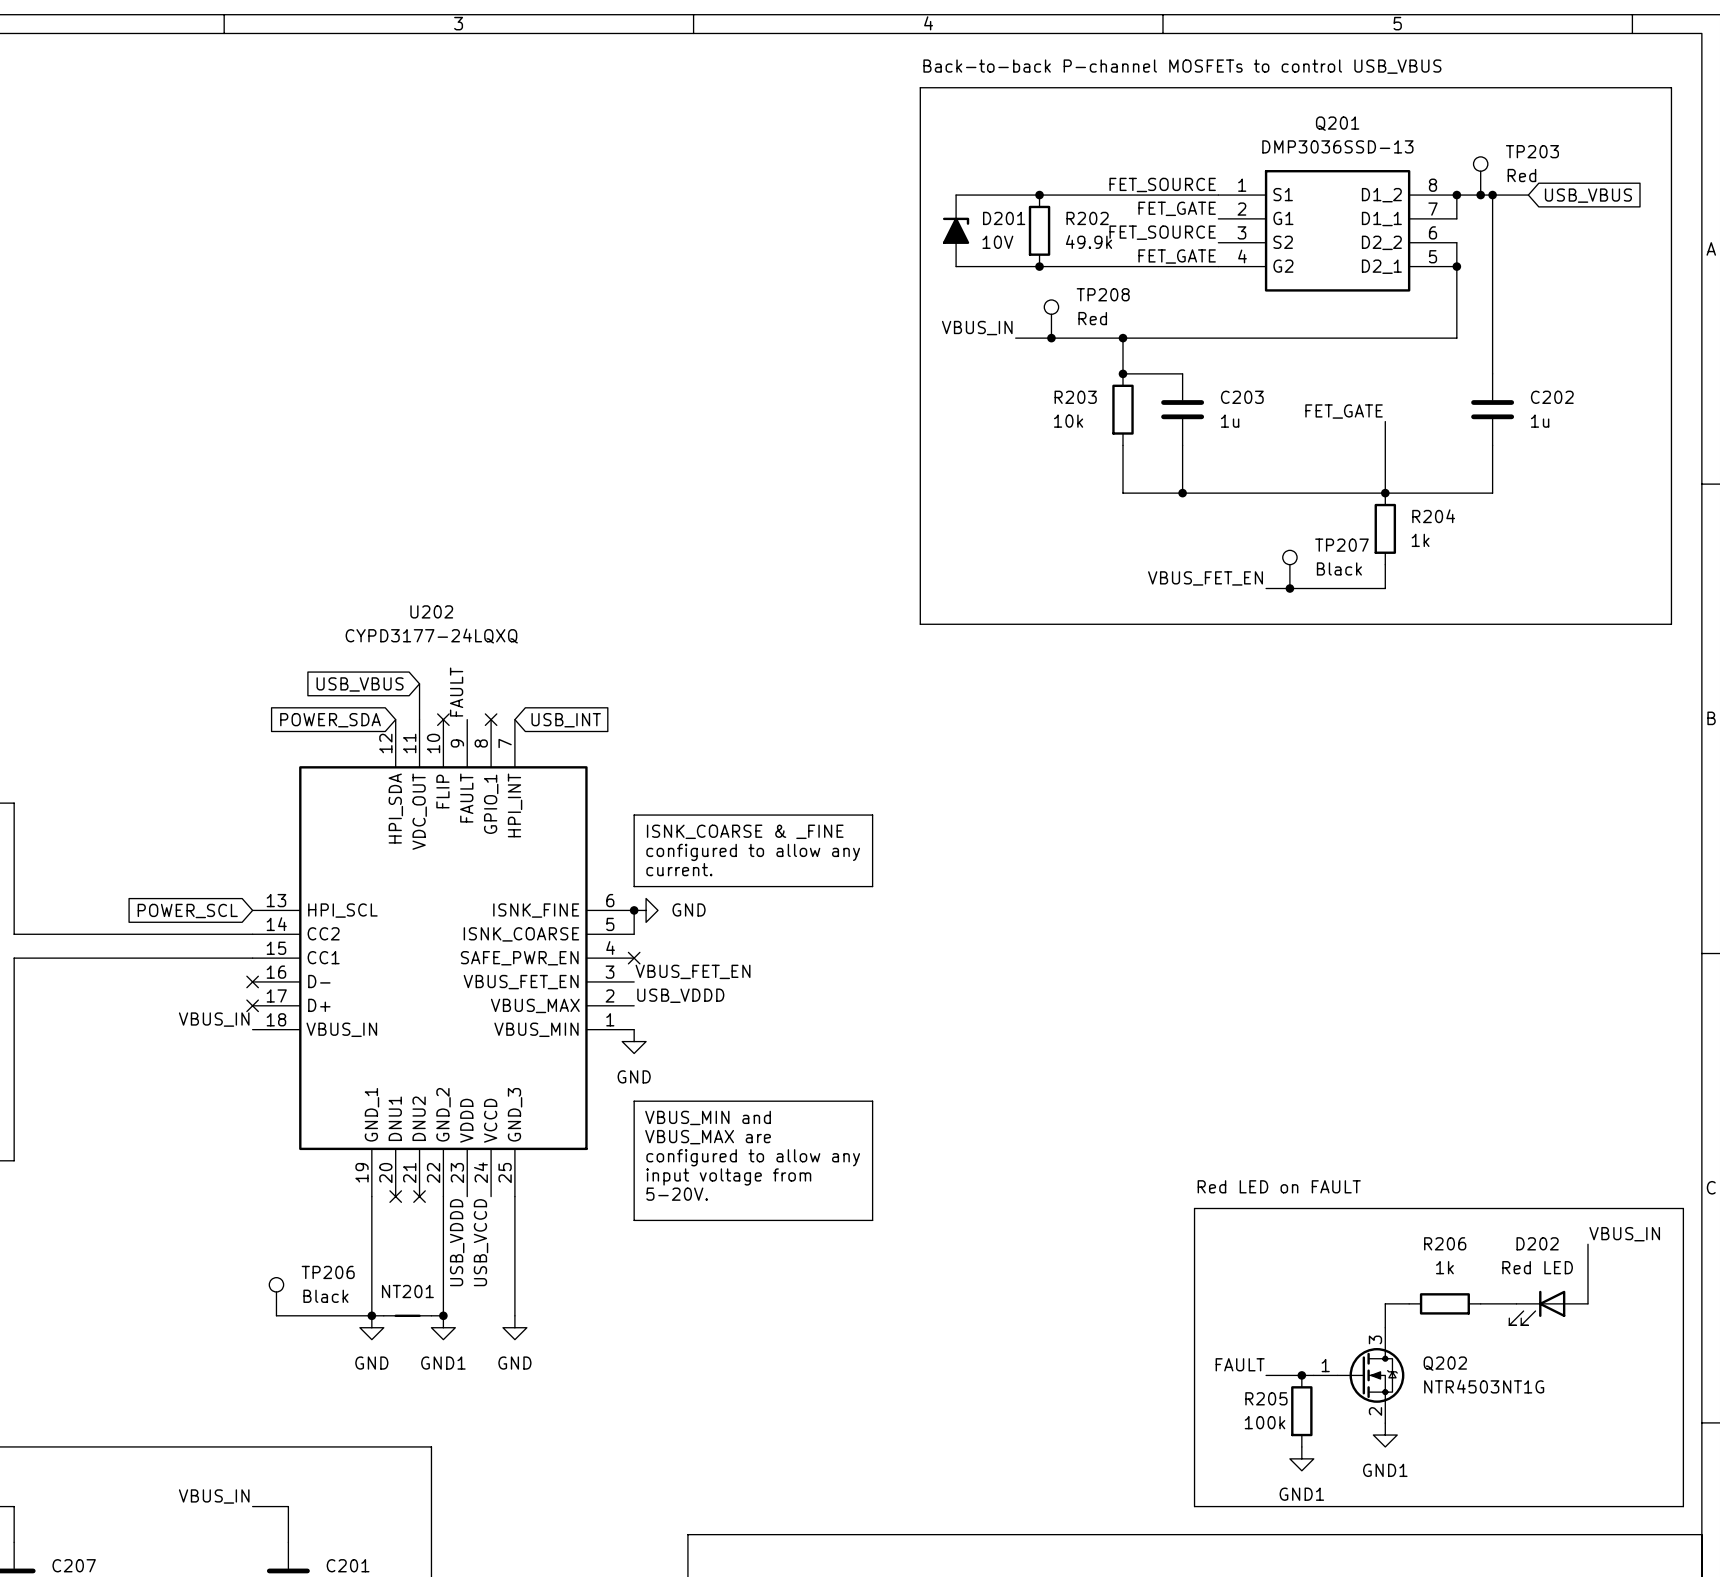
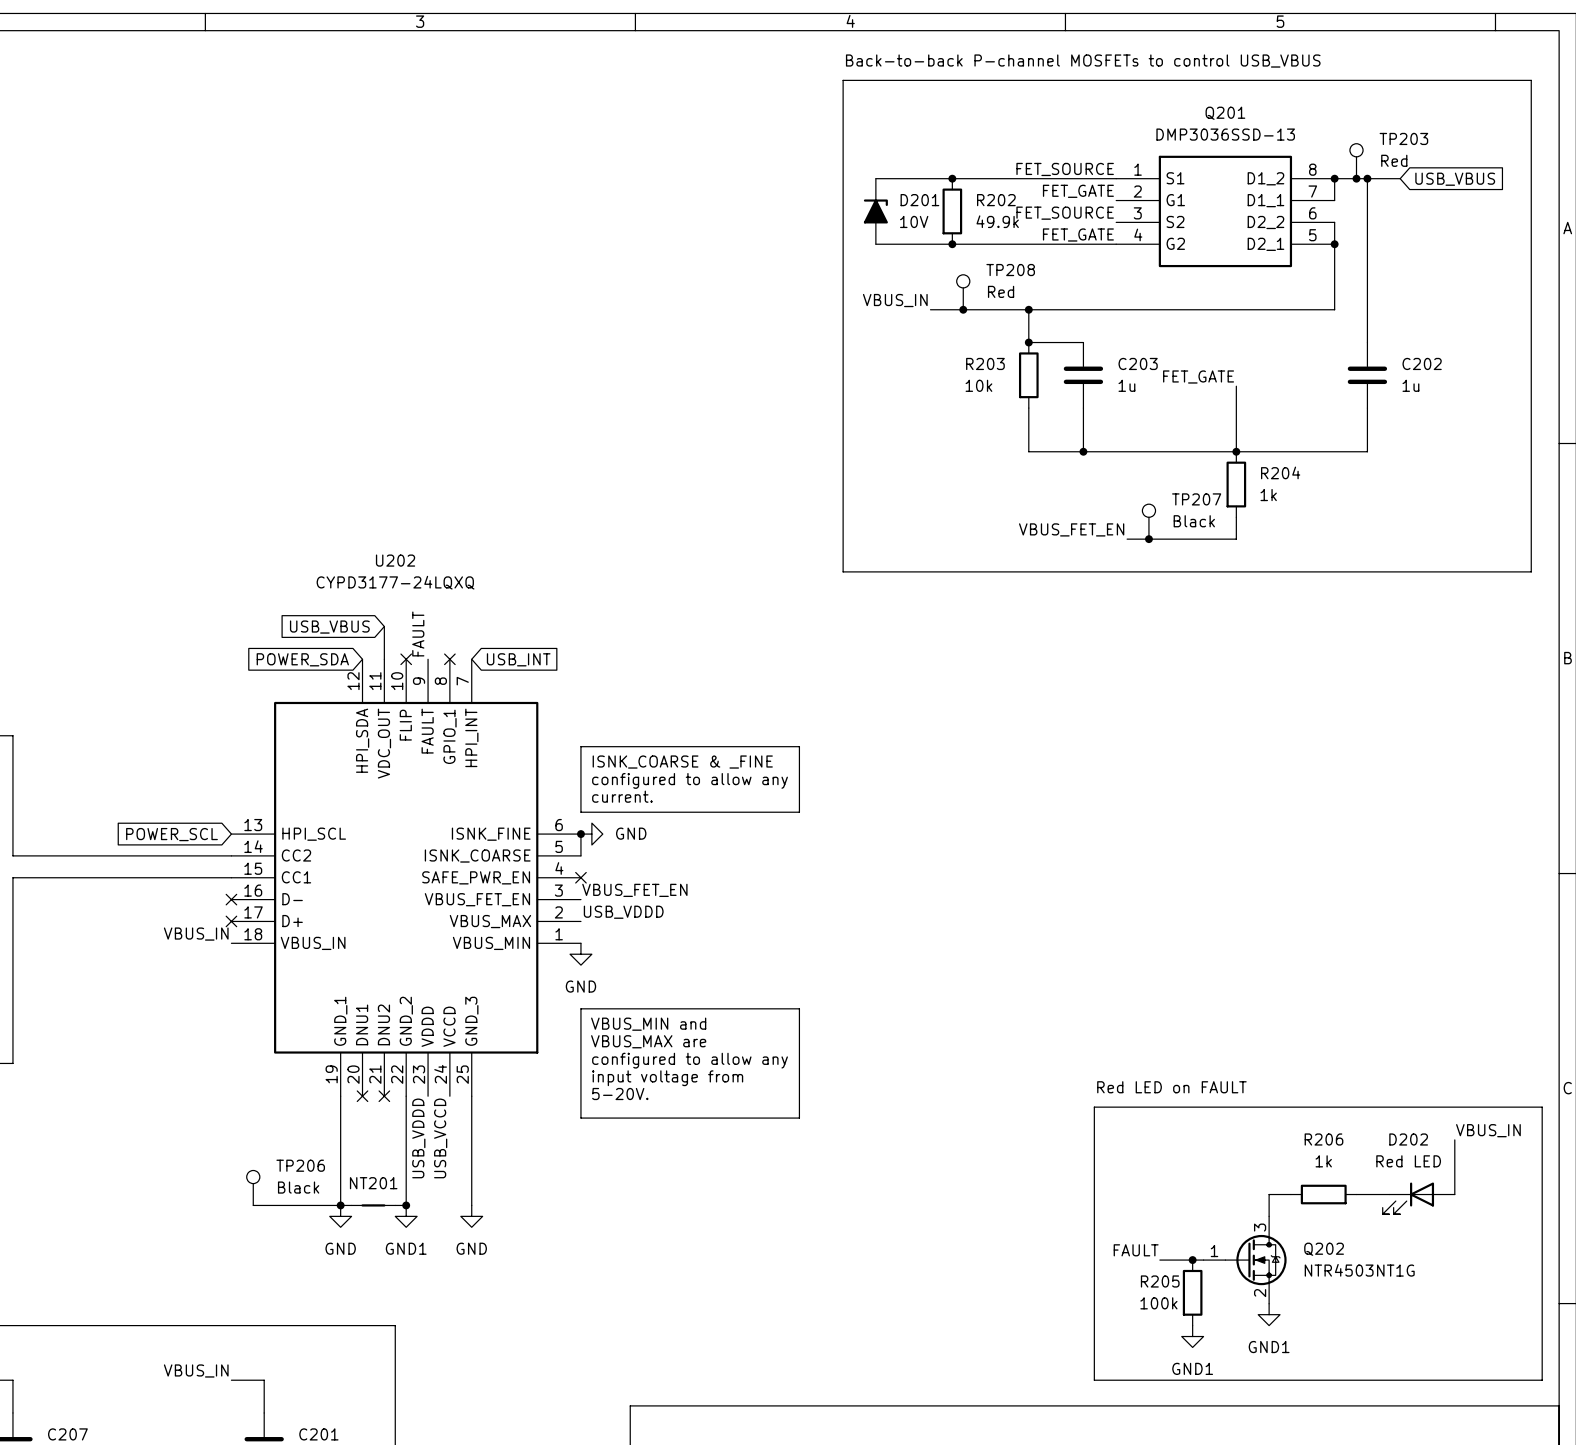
label position: FET_GATE (1344, 411) -> FET_GATE (1198, 376)
wire: (1385, 421) (1385, 493) -> (1236, 386) (1236, 451)
junction position: (1385, 493) -> (1236, 451)
R204 position: (1385, 528) -> (1236, 484)
wire: (1385, 564) (1385, 588) (1349, 588) -> (1236, 517) (1236, 539)
TP207 position: (1289, 569) -> (1148, 521)
label position: VBUS_FET_EN (1205, 578) -> VBUS_FET_EN (1071, 529)
wire: none -> (1127, 539) (1159, 539)
junction position: (1289, 588) -> (1148, 539)

